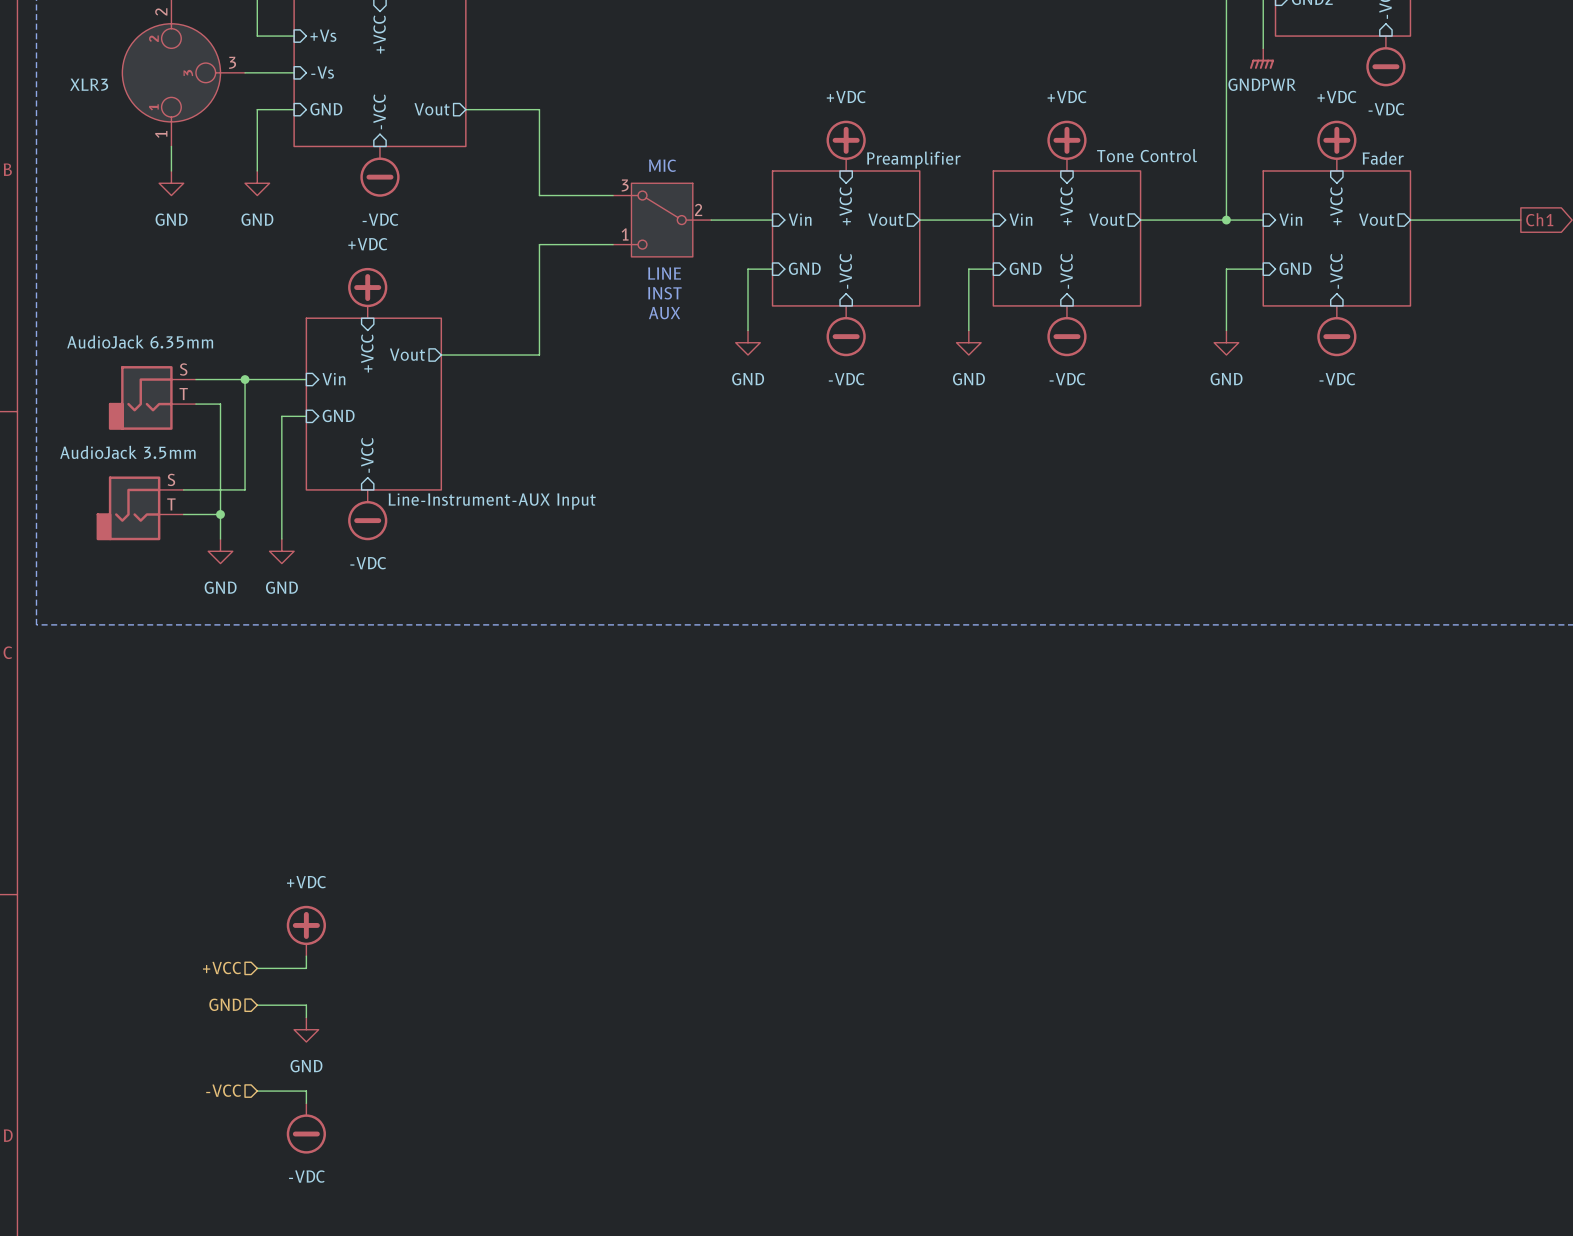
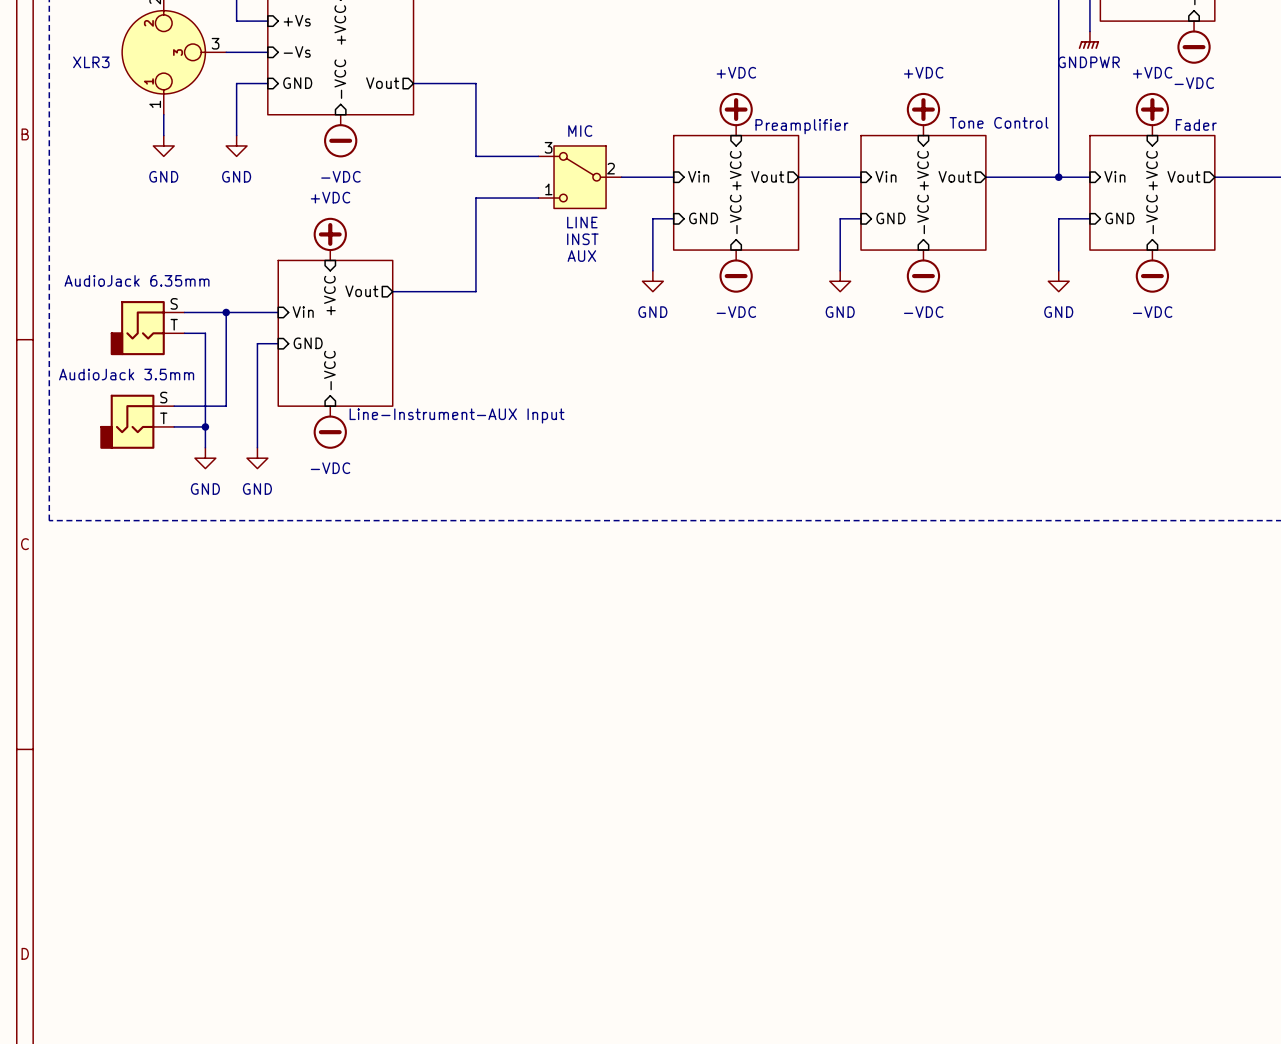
power symbol: +VDC (306, 930) -> none
wire: (306, 956) (306, 968) (257, 968) -> none
hierarchical label: +VCC (222, 968) -> none
hierarchical label: GND (225, 1004) -> none
wire: (257, 1005) (306, 1005) (306, 1017) -> none
power symbol: GND (306, 1029) -> none
hierarchical label: -VCC (223, 1090) -> none
wire: (257, 1091) (306, 1091) (306, 1103) -> none
power symbol: -VDC (306, 1128) -> none

